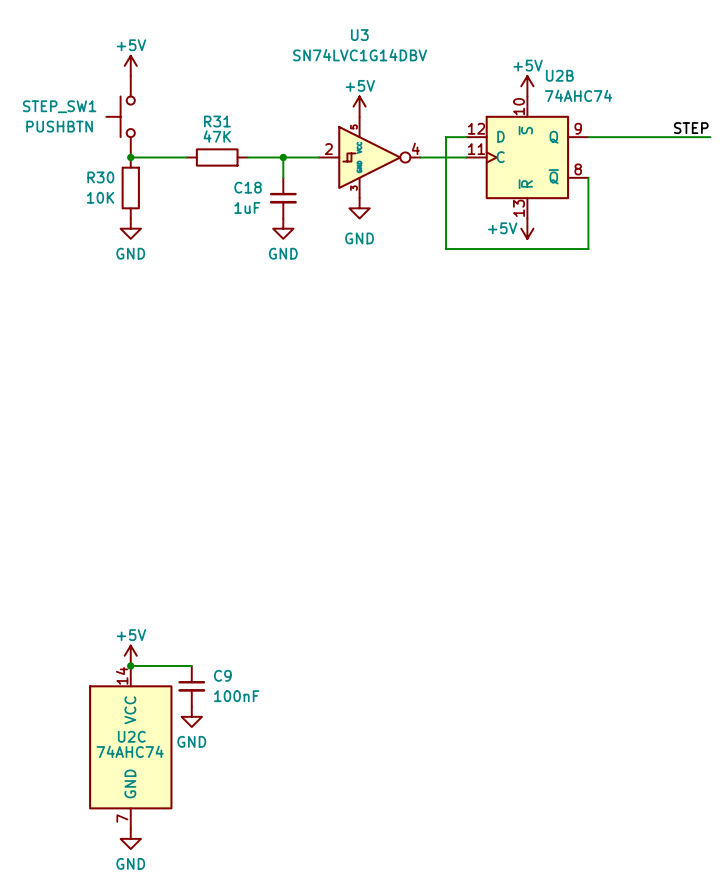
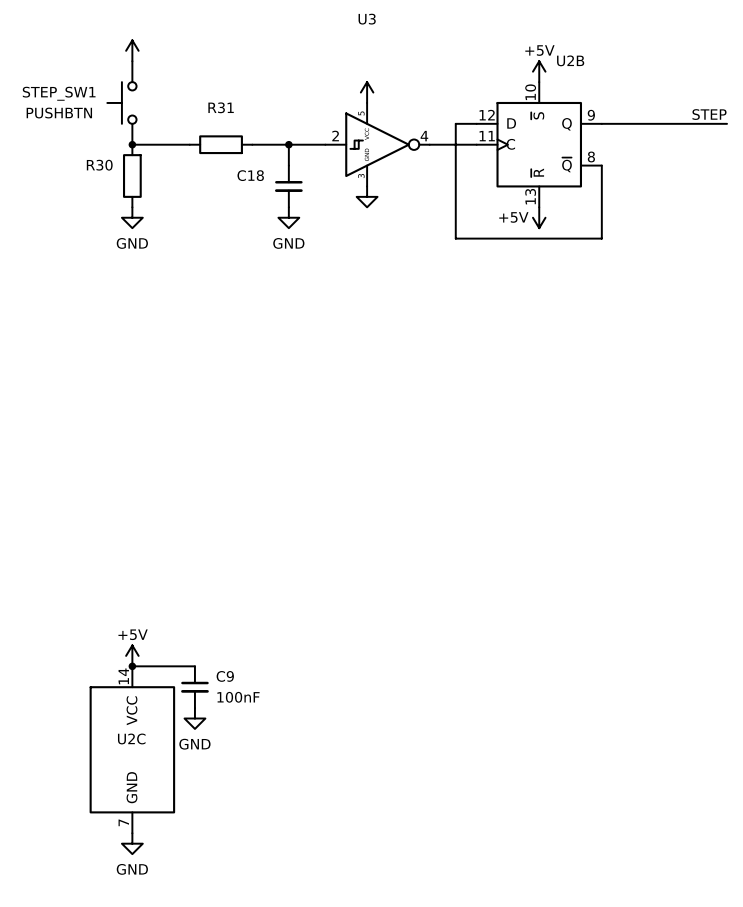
power symbol text: +5V (131, 45) -> none
U3 value: SN74LVC1G14DBV (360, 55) -> none
power symbol text: +5V (360, 85) -> none
U2B value: 74AHC74 (578, 95) -> none
R31 value: 47K (217, 136) -> none
R30 value: 10K (100, 197) -> none
C18 value: 1uF (247, 207) -> none
power symbol text: GND (359, 238) -> none
U2C value: 74AHC74 (130, 751) -> none

